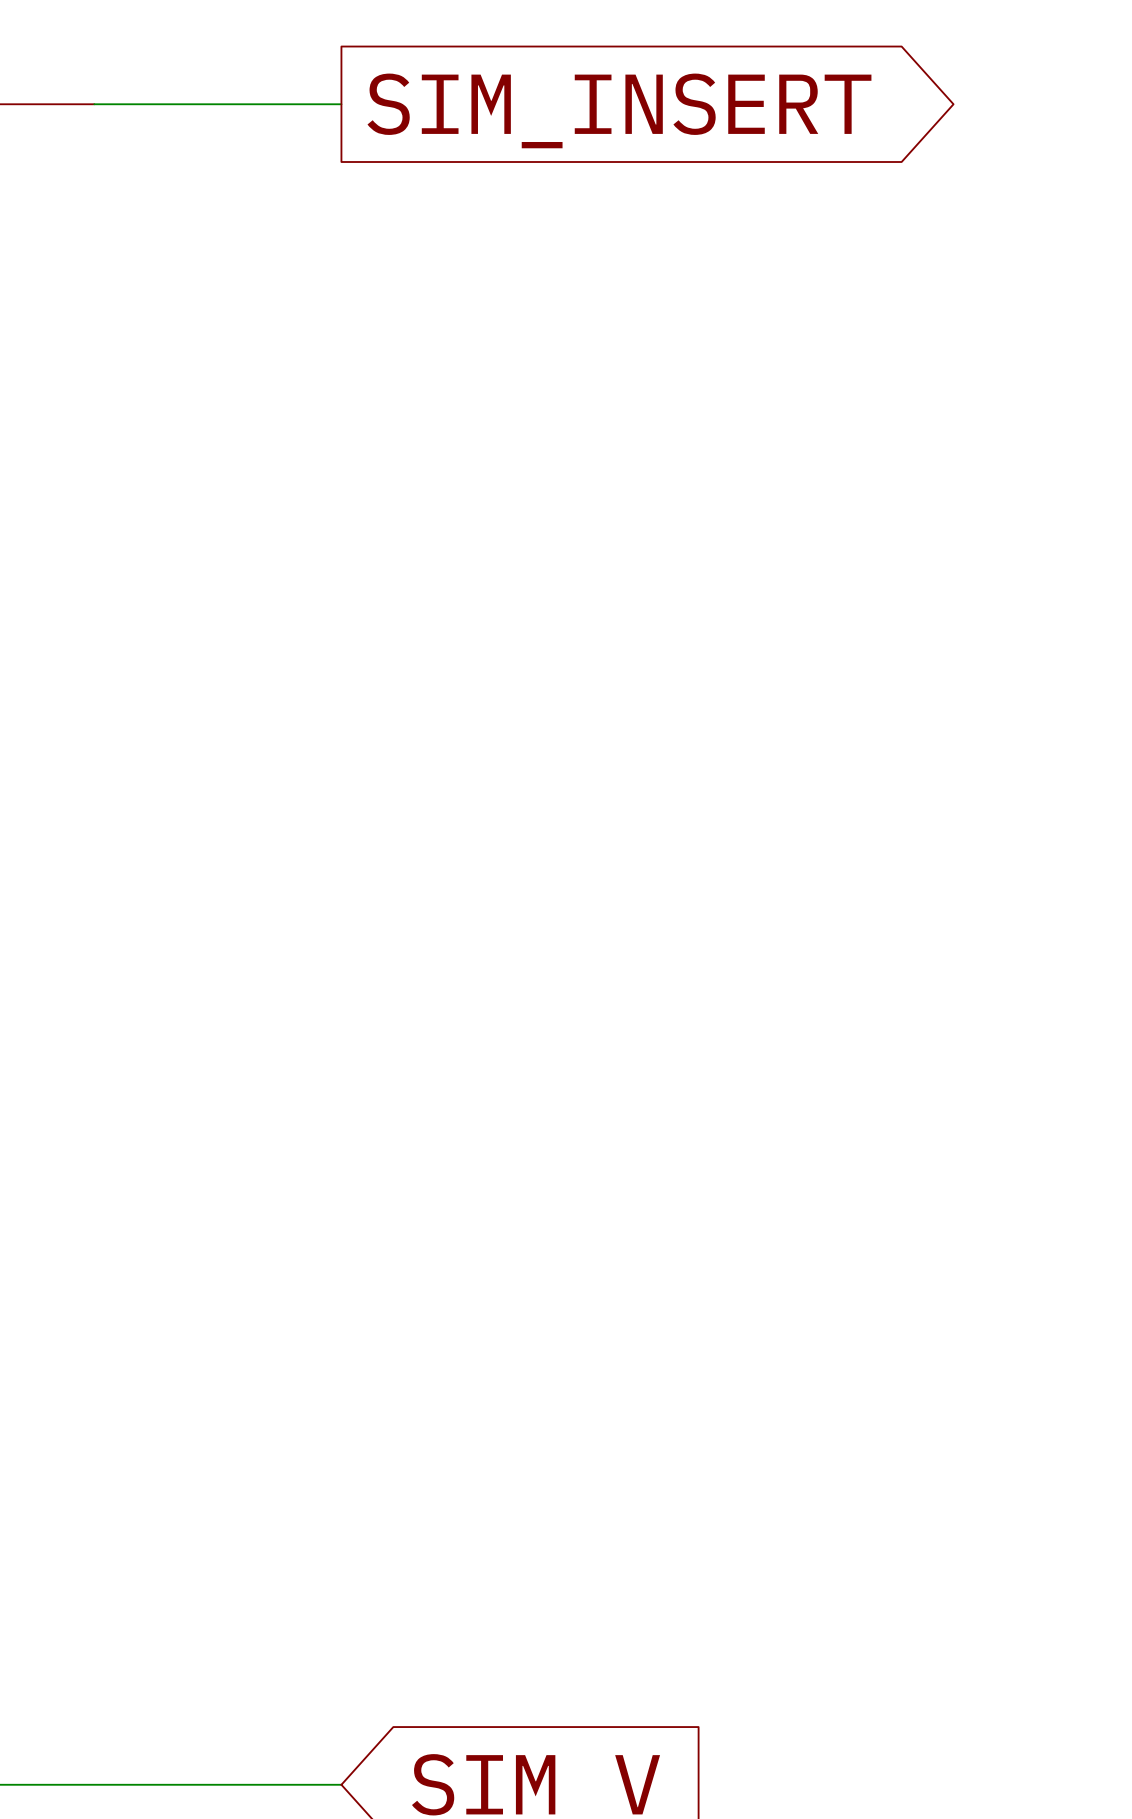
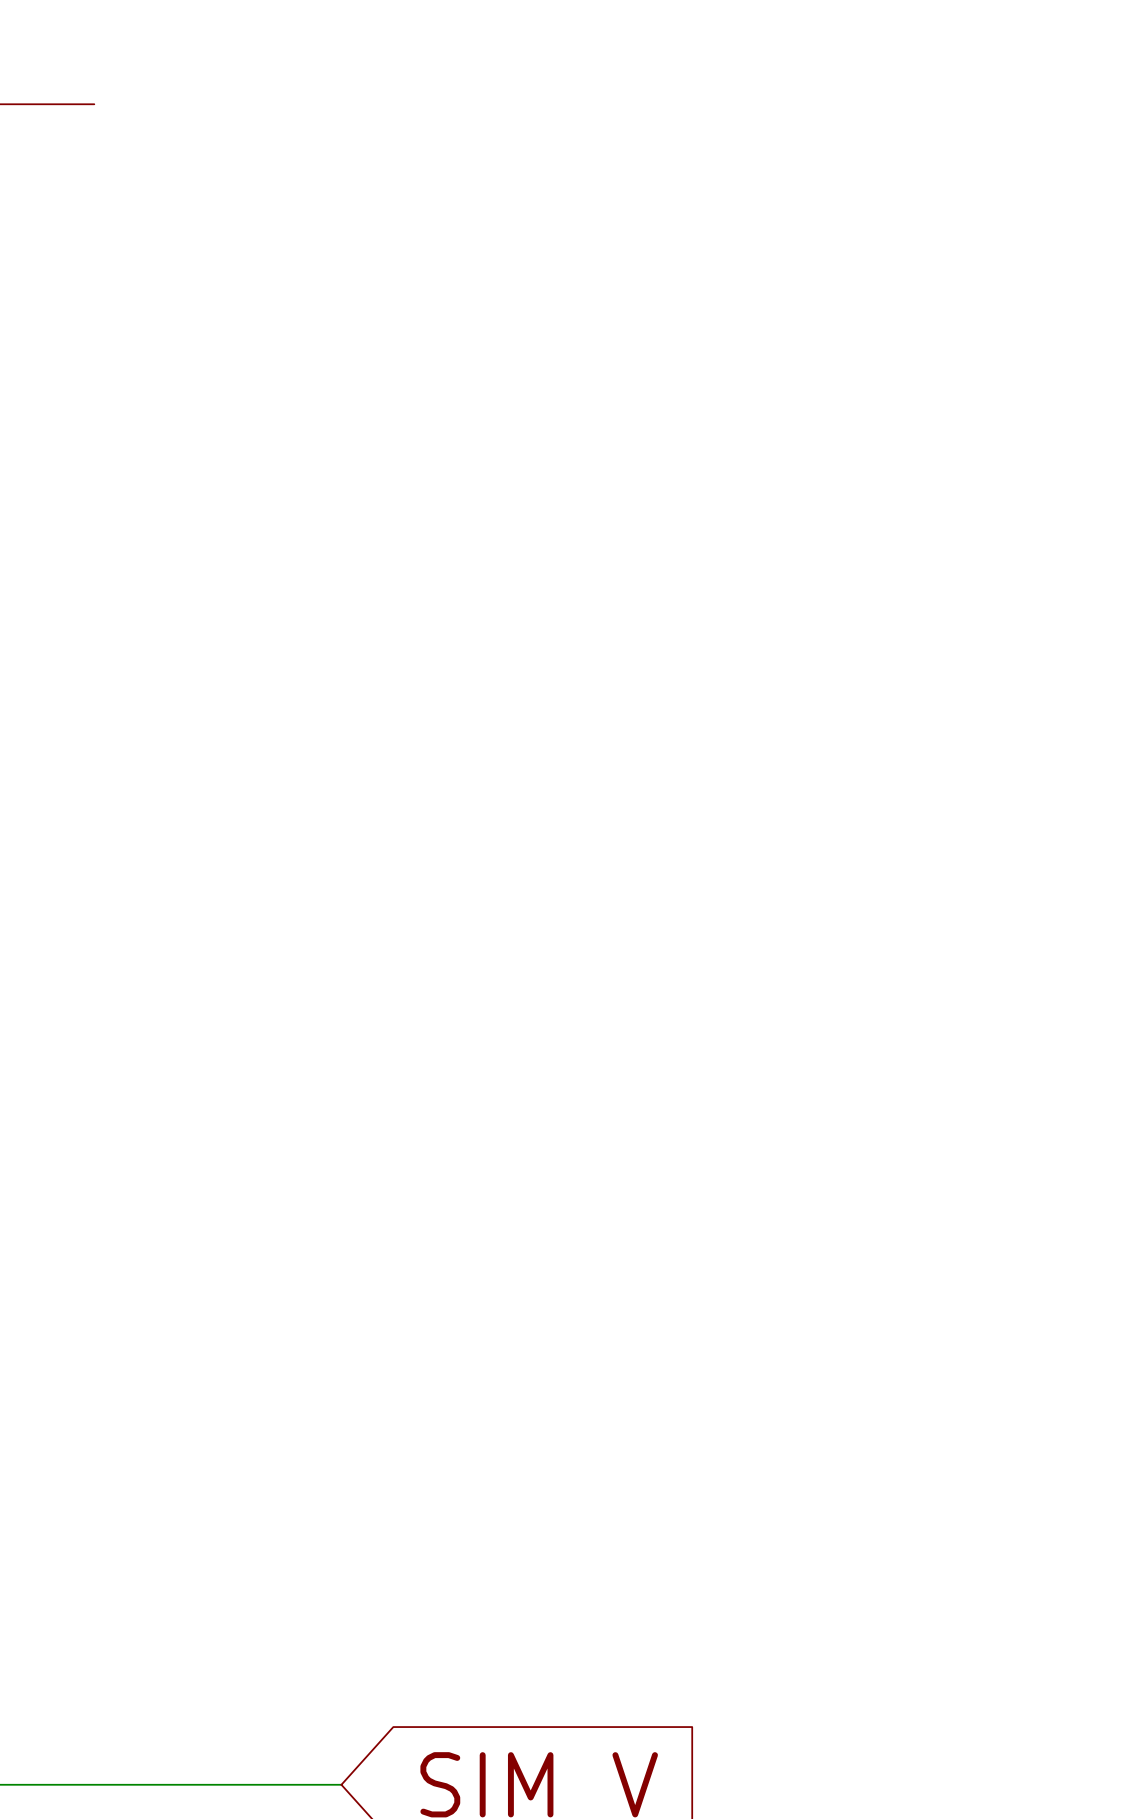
wire: (94, 104) (341, 104) -> none
global label: SIM_INSERT (619, 110) -> none

